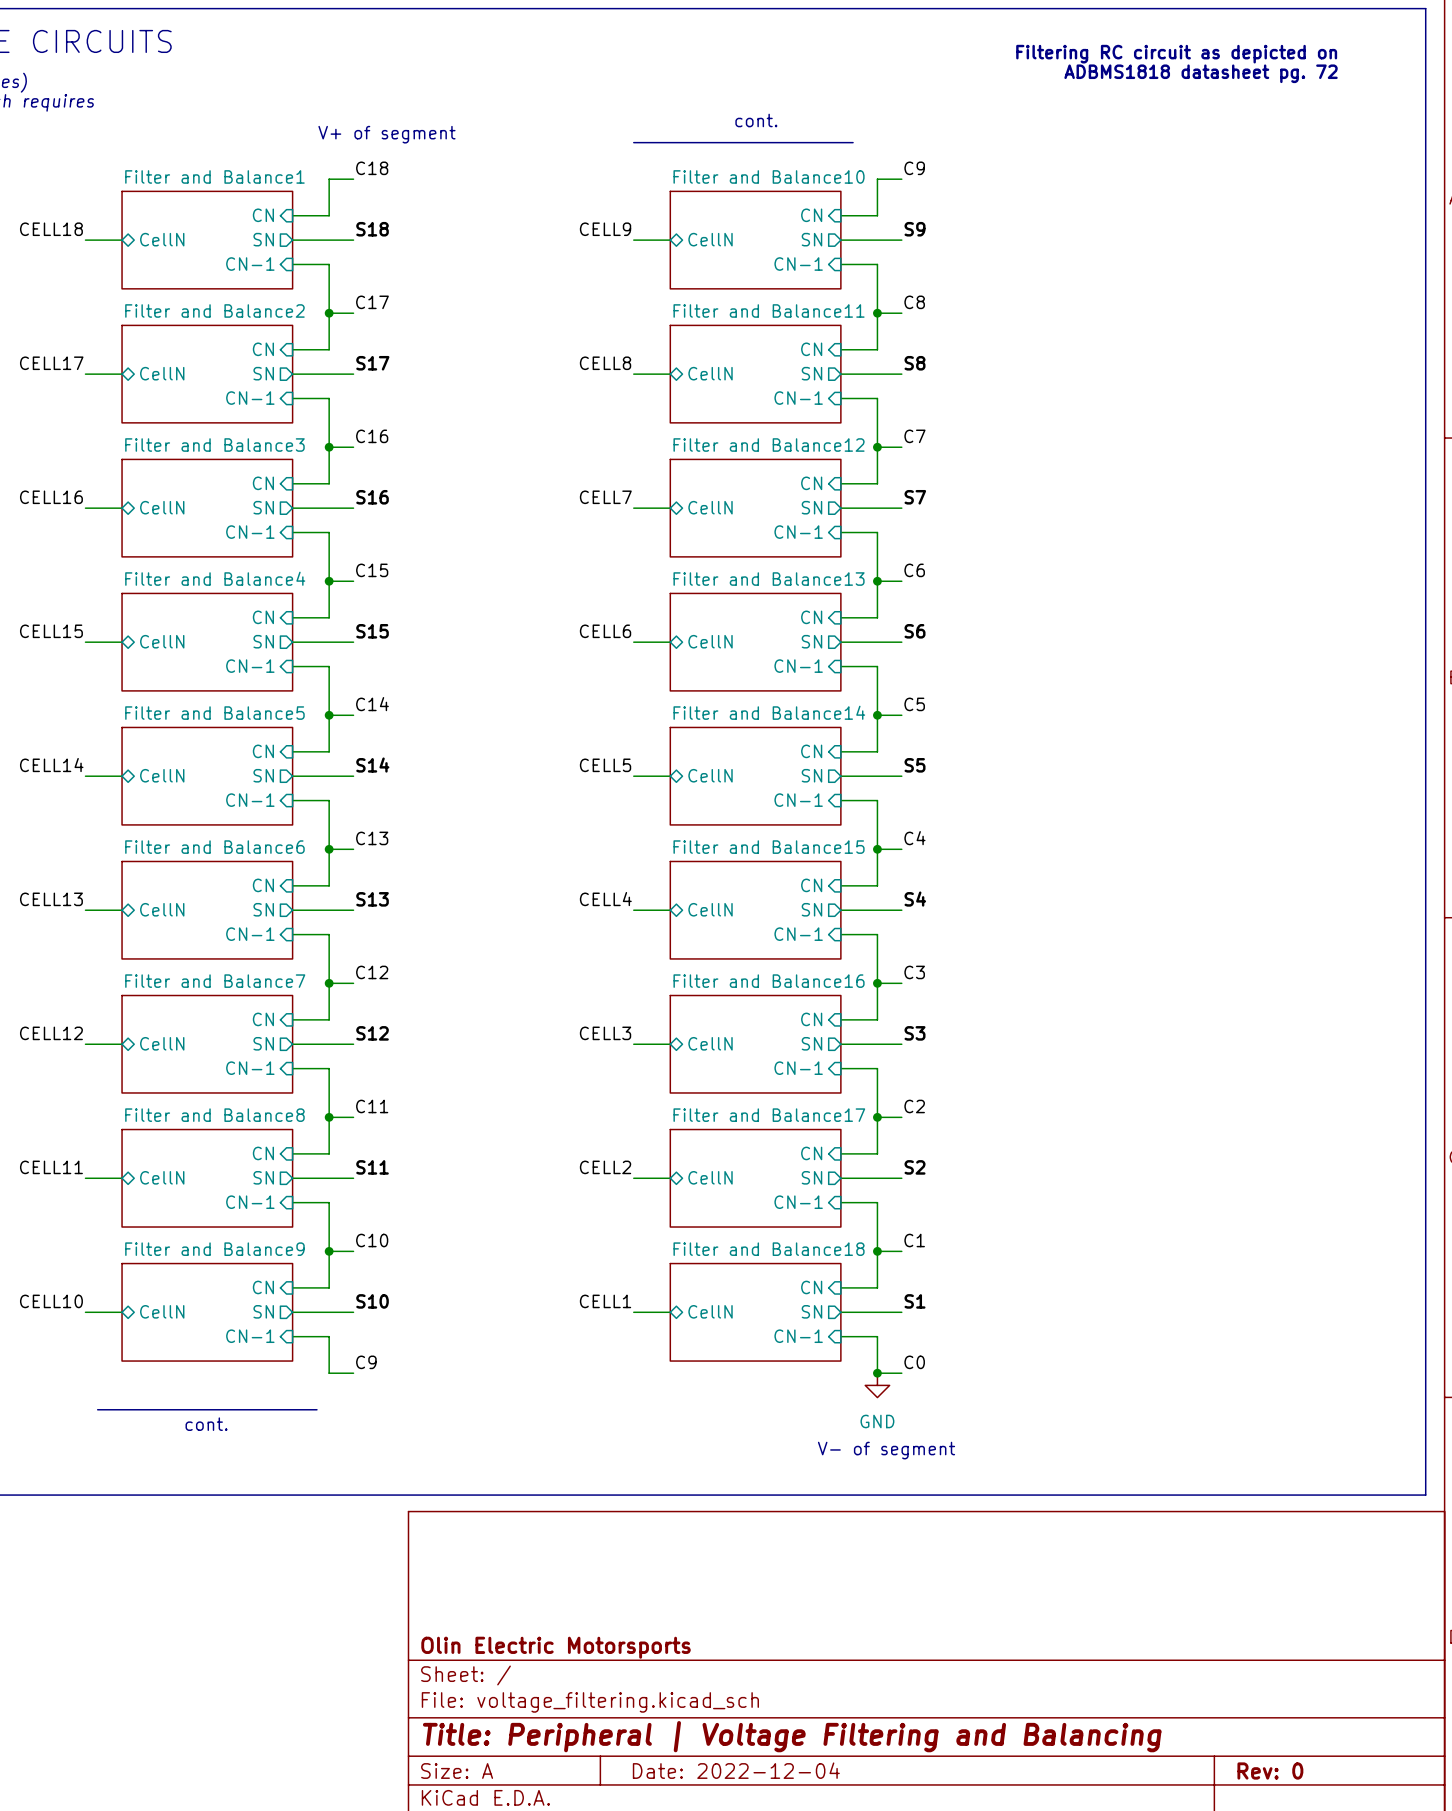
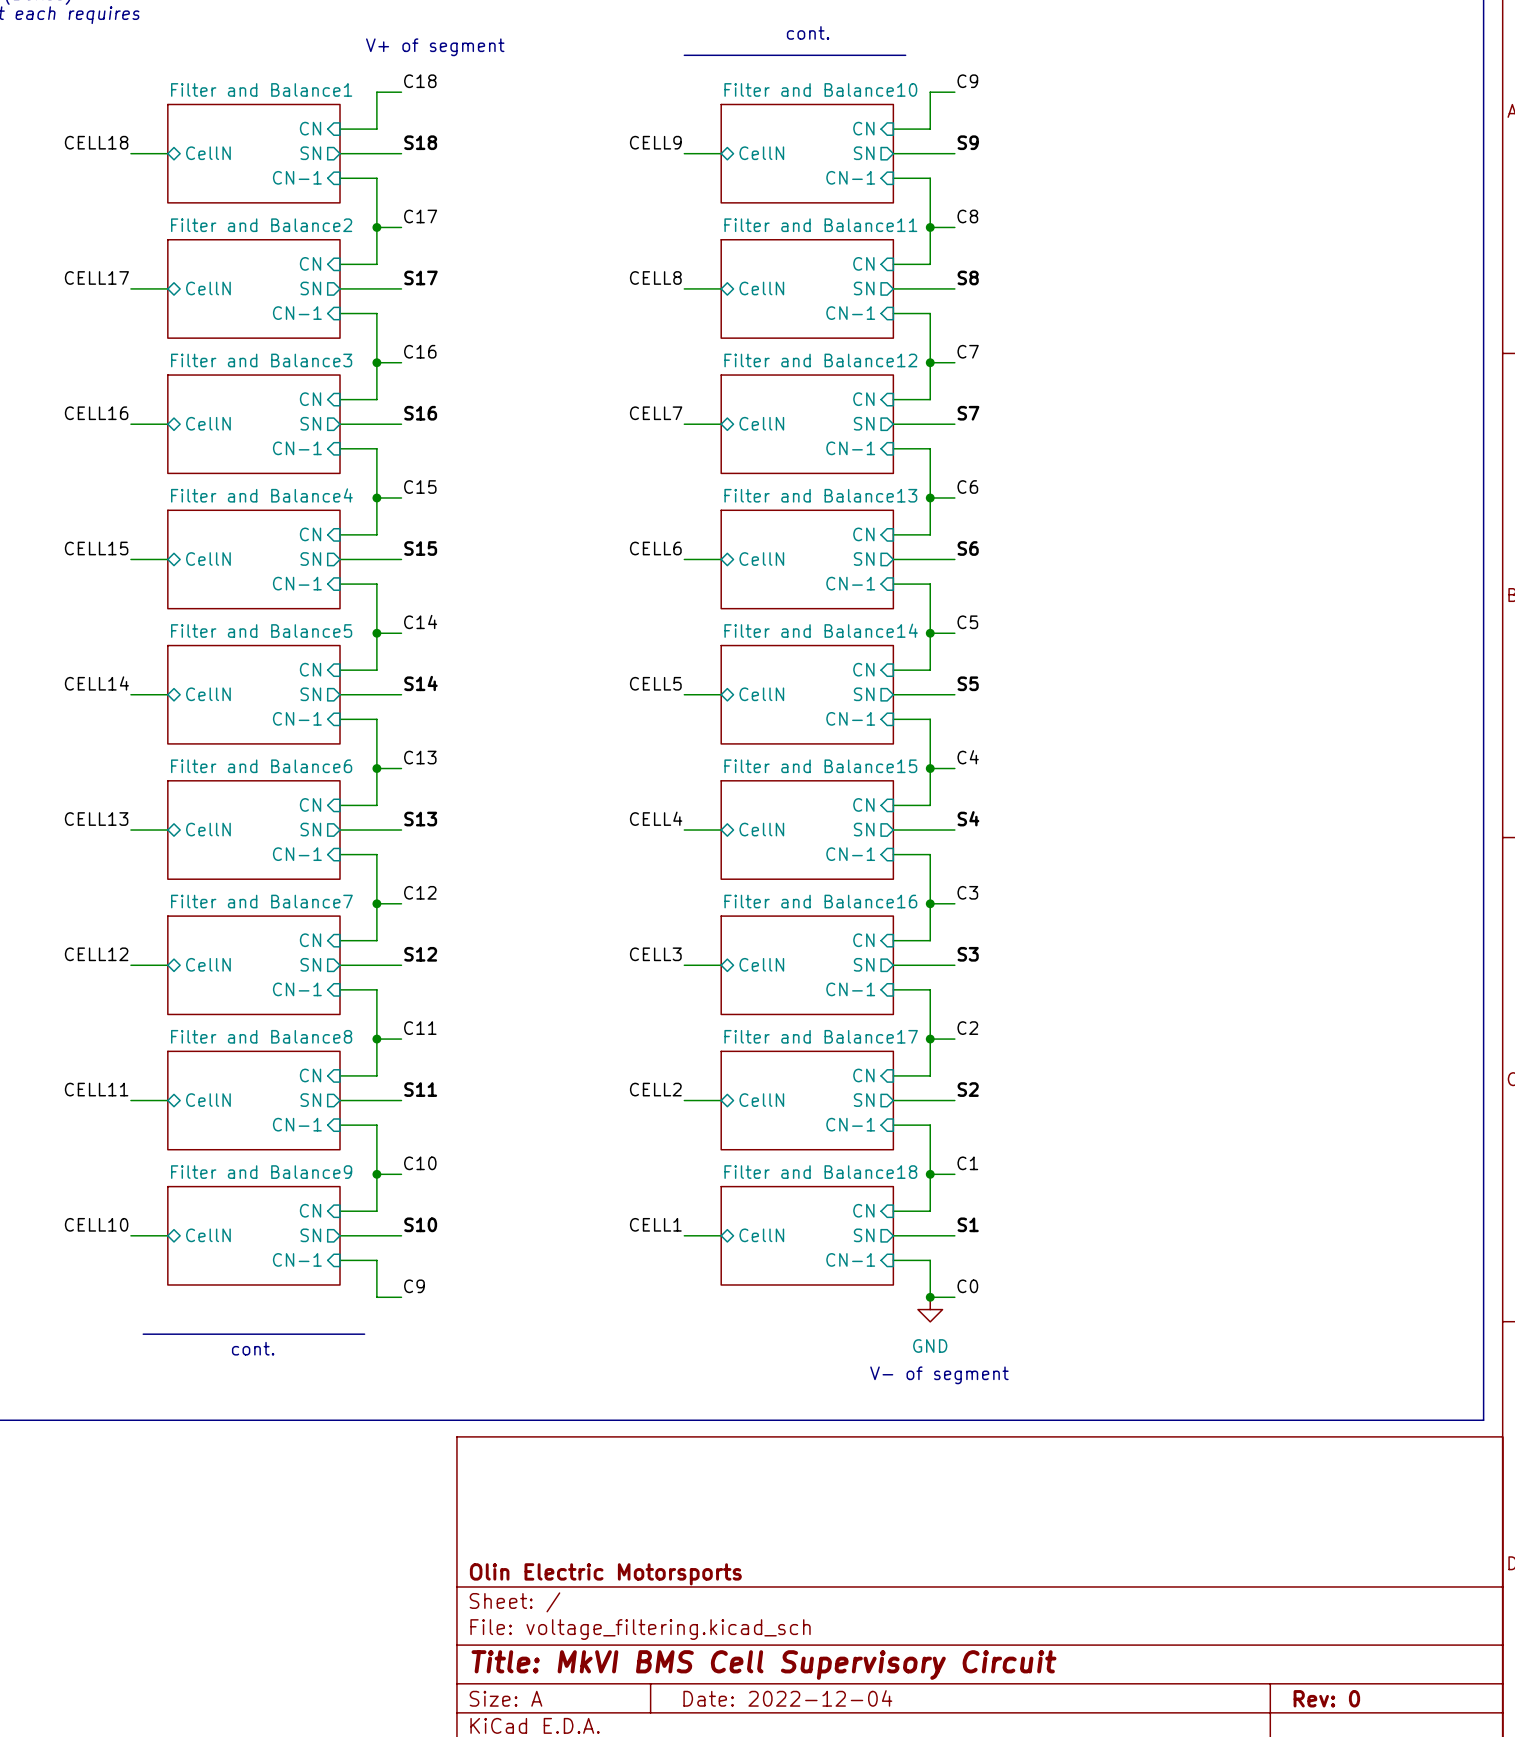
title block: Title: Peripheral | Voltage Filtering and Balancing (792, 1736) -> Title: MkVI BMS Cell Supervisory Circuit (764, 1665)

